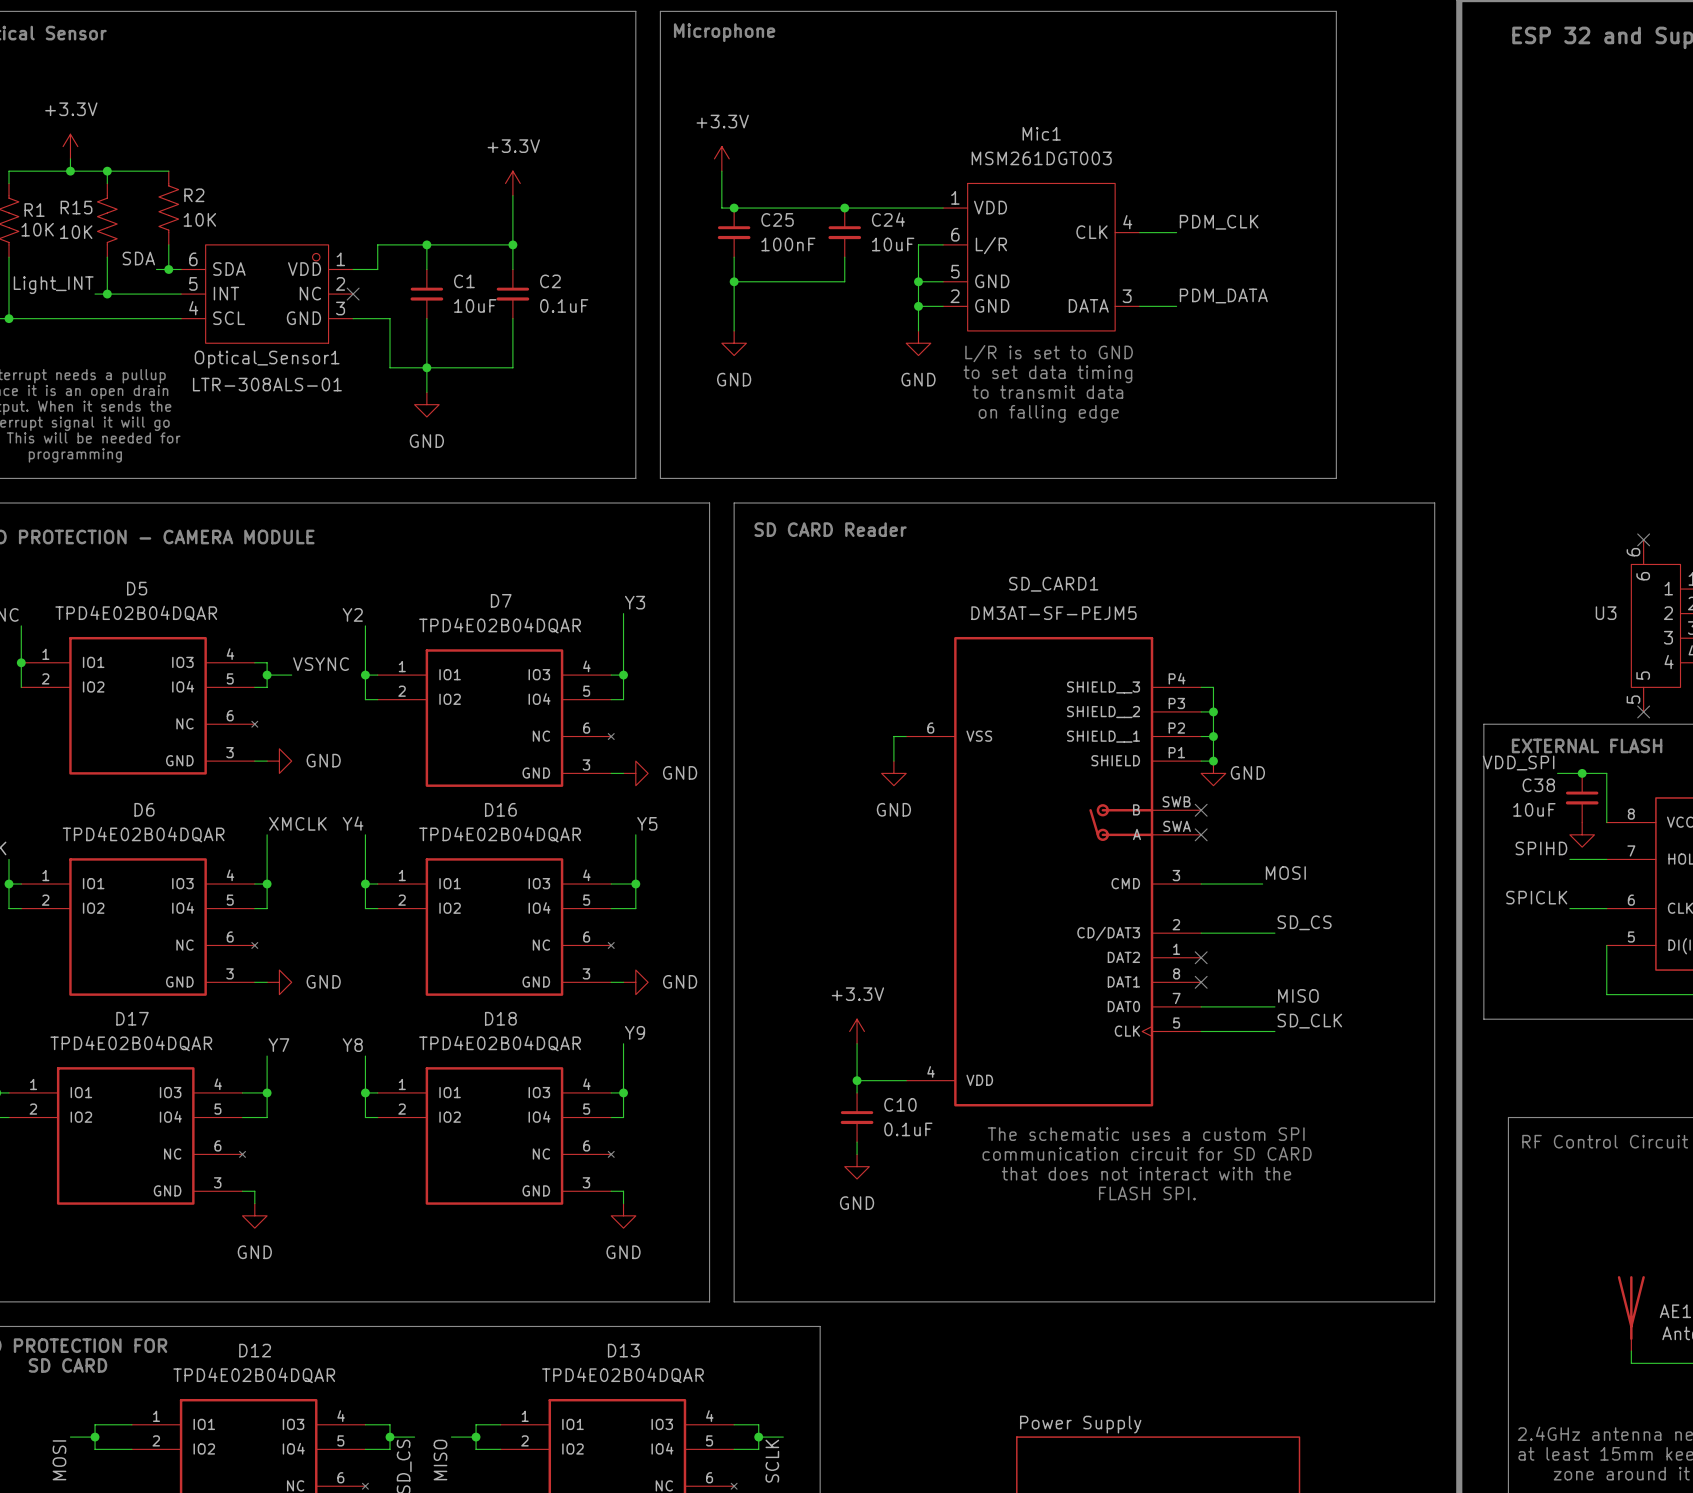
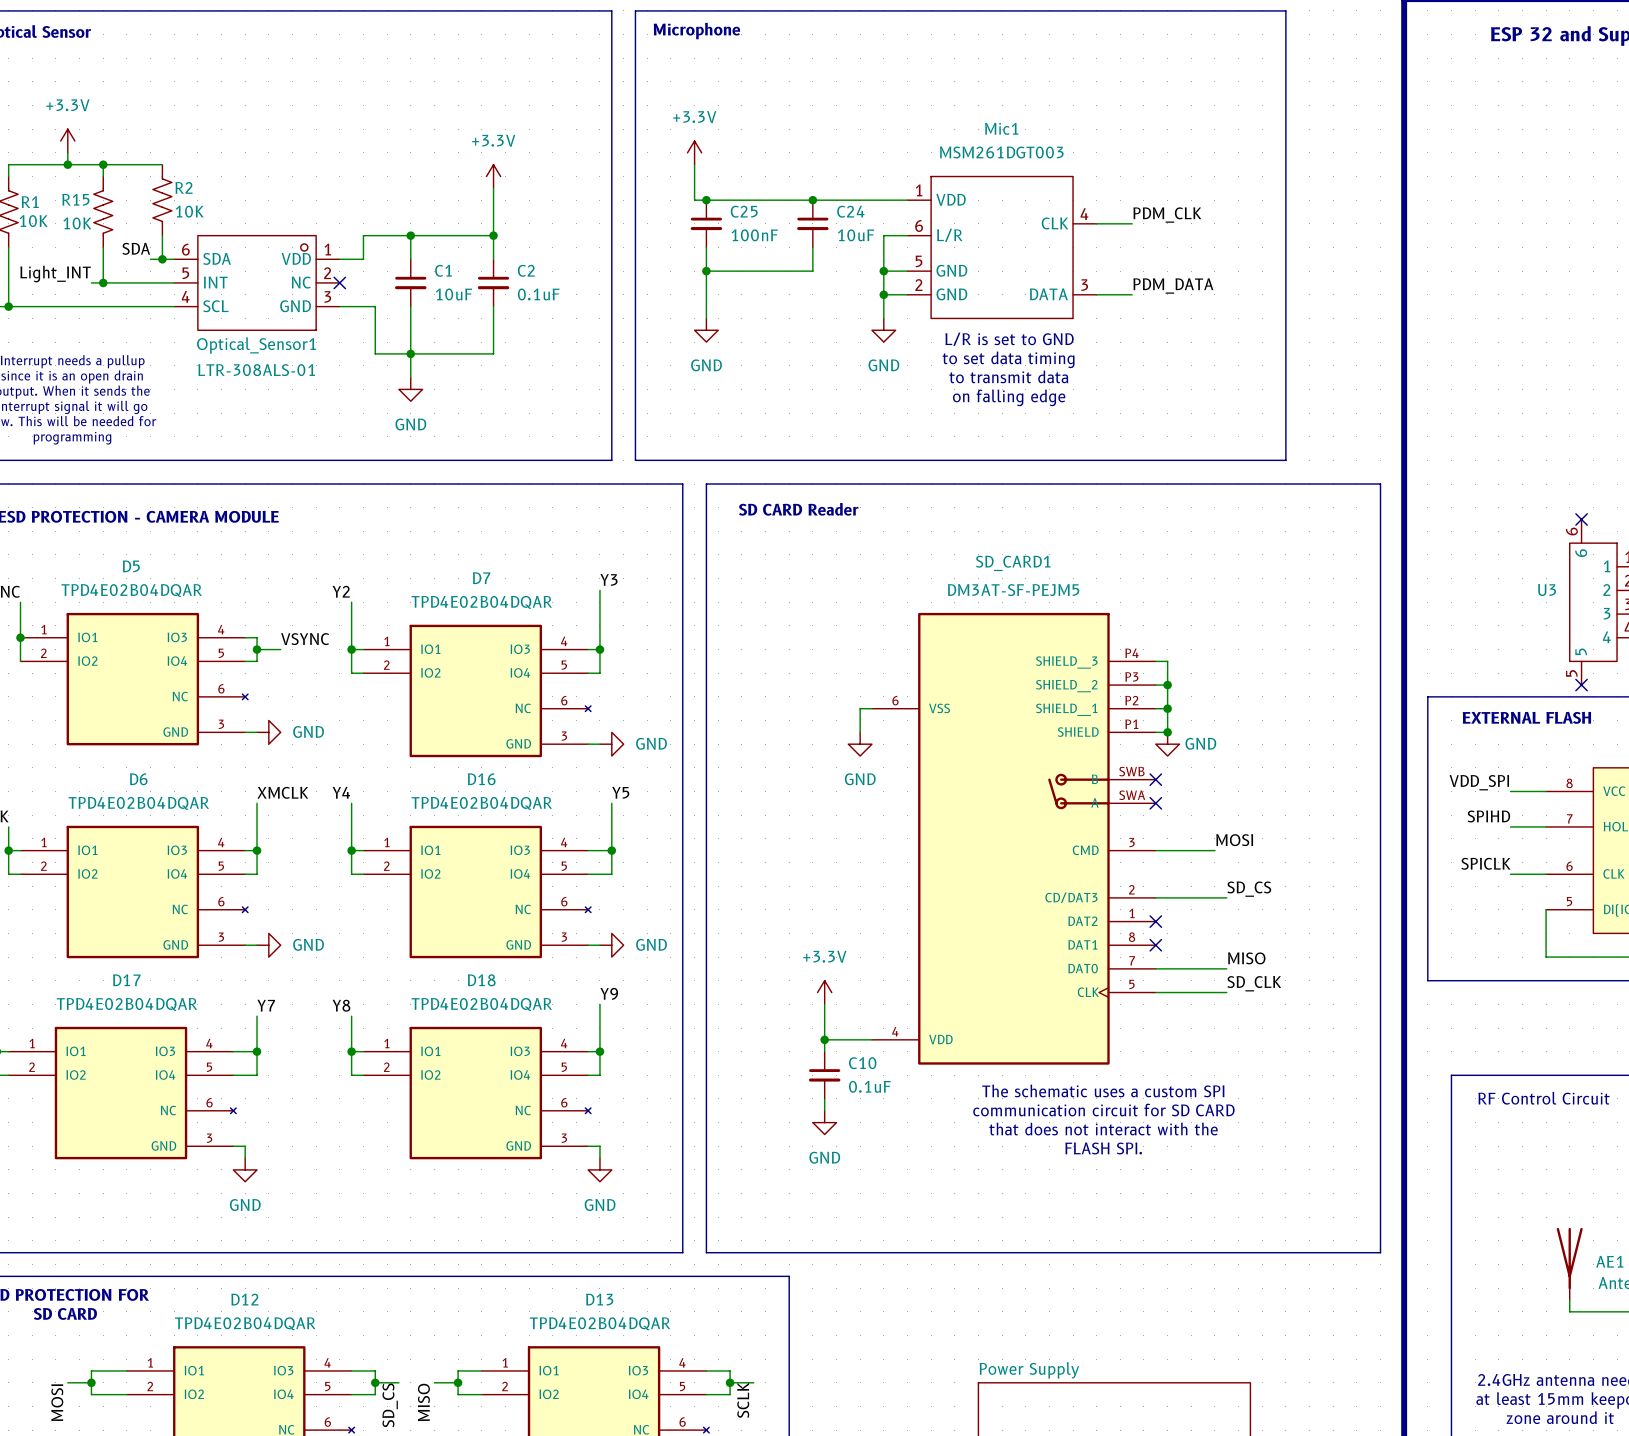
label position: VDD_SPI (1518, 763) -> VDD_SPI (1479, 782)
wire: (1557, 773) (1606, 773) (1606, 822) -> (1510, 791) (1546, 791)
junction: (1582, 773) -> none
C38: 10uF (1582, 797) -> none
power symbol: (1582, 834) -> none

